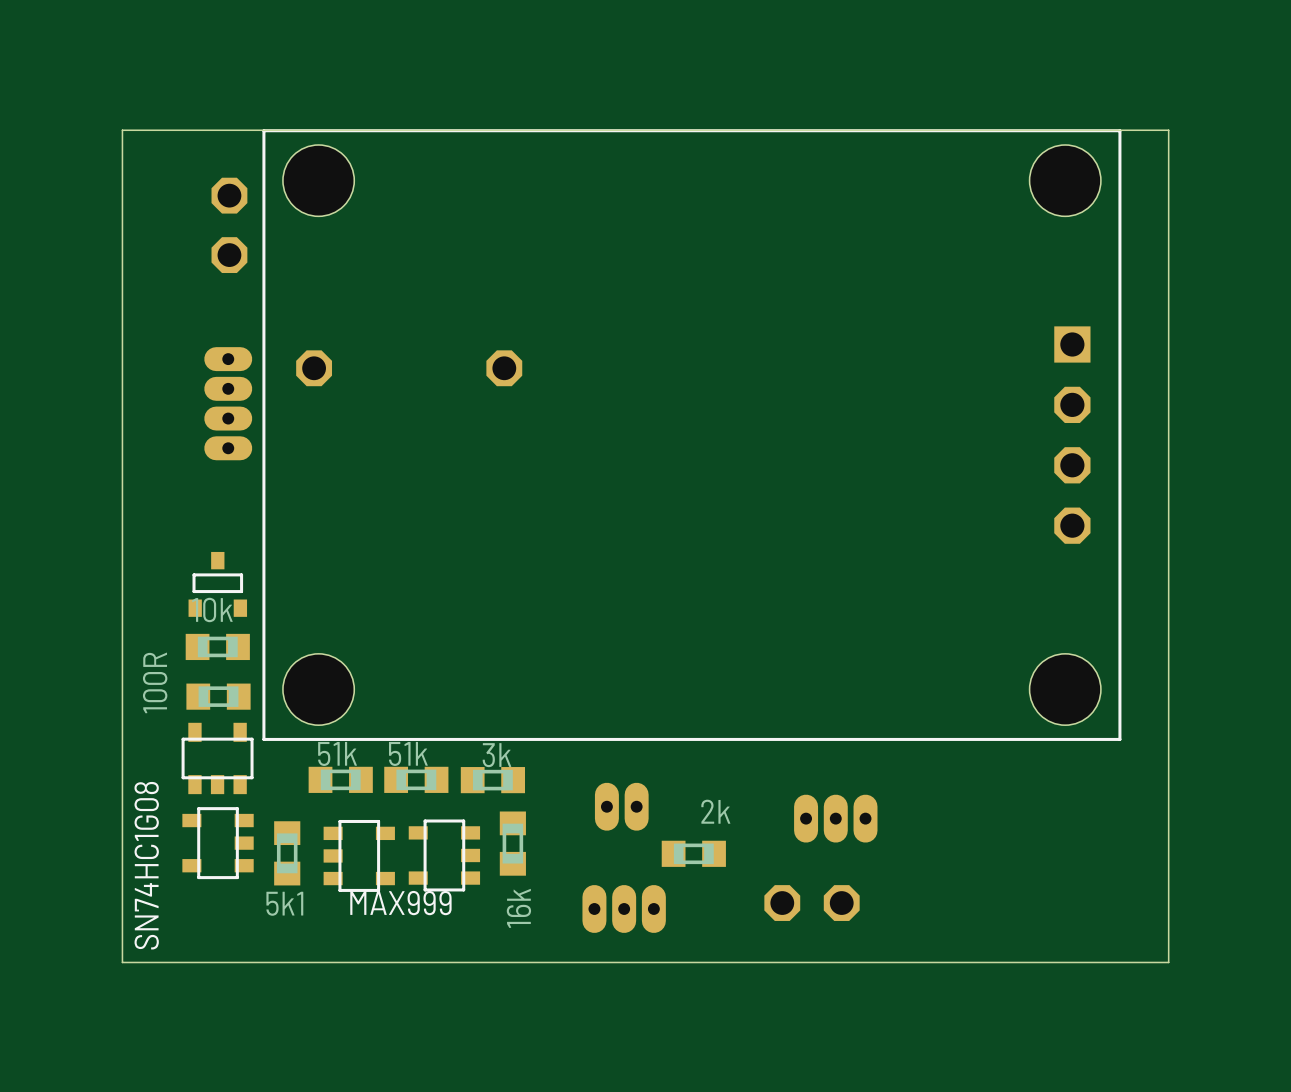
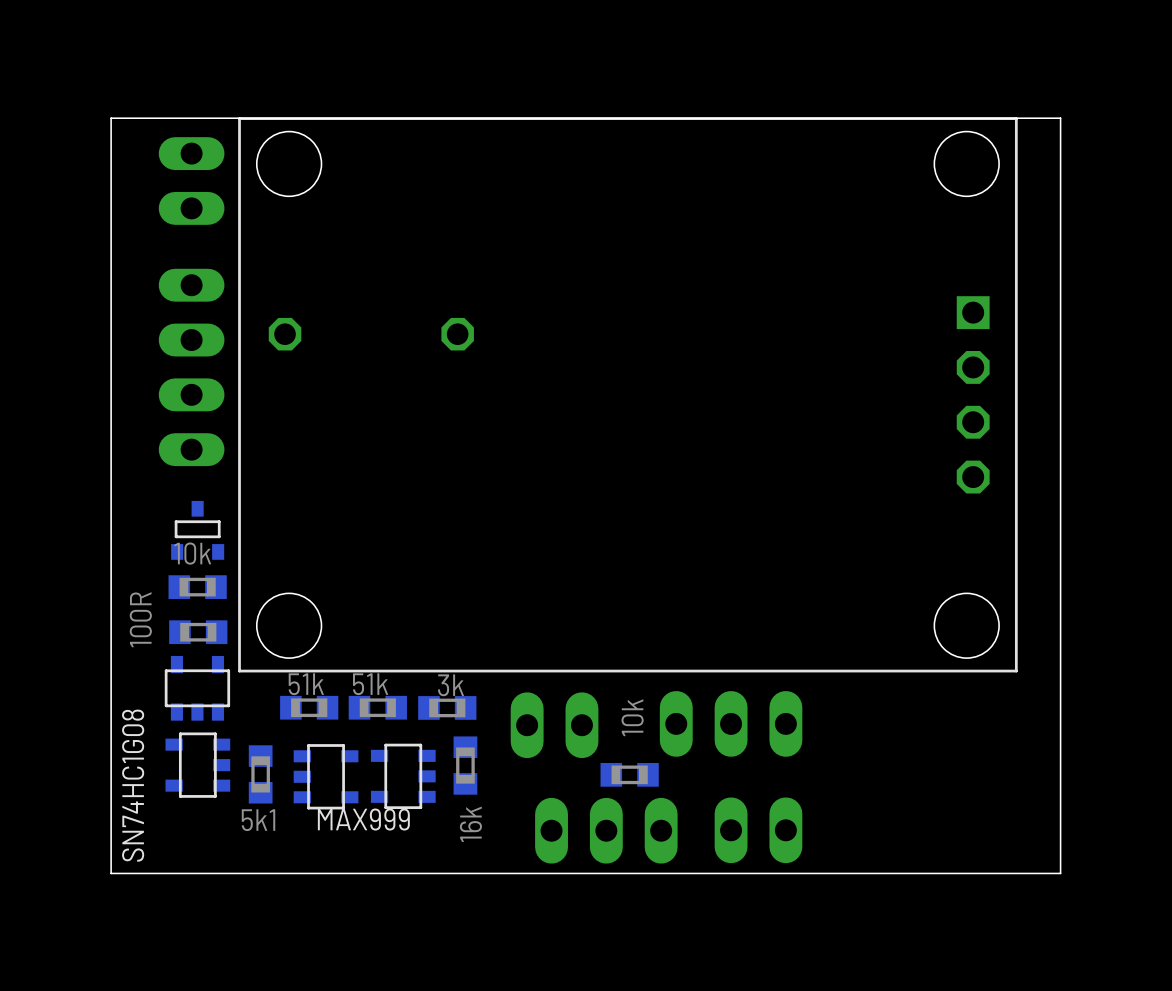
part: none -> (191, 181)
part: (229, 225) -> none
part footprint: [204, 347, 253, 461] -> [158, 268, 225, 467]
part footprint: [594, 782, 649, 831] -> [510, 692, 599, 759]
part: none -> (731, 723)
part value: 2k (715, 811) -> 10k (632, 717)
part: (835, 818) -> none
part: (812, 903) -> none
part: (624, 908) -> none
part: none -> (758, 830)
part: none -> (606, 830)

